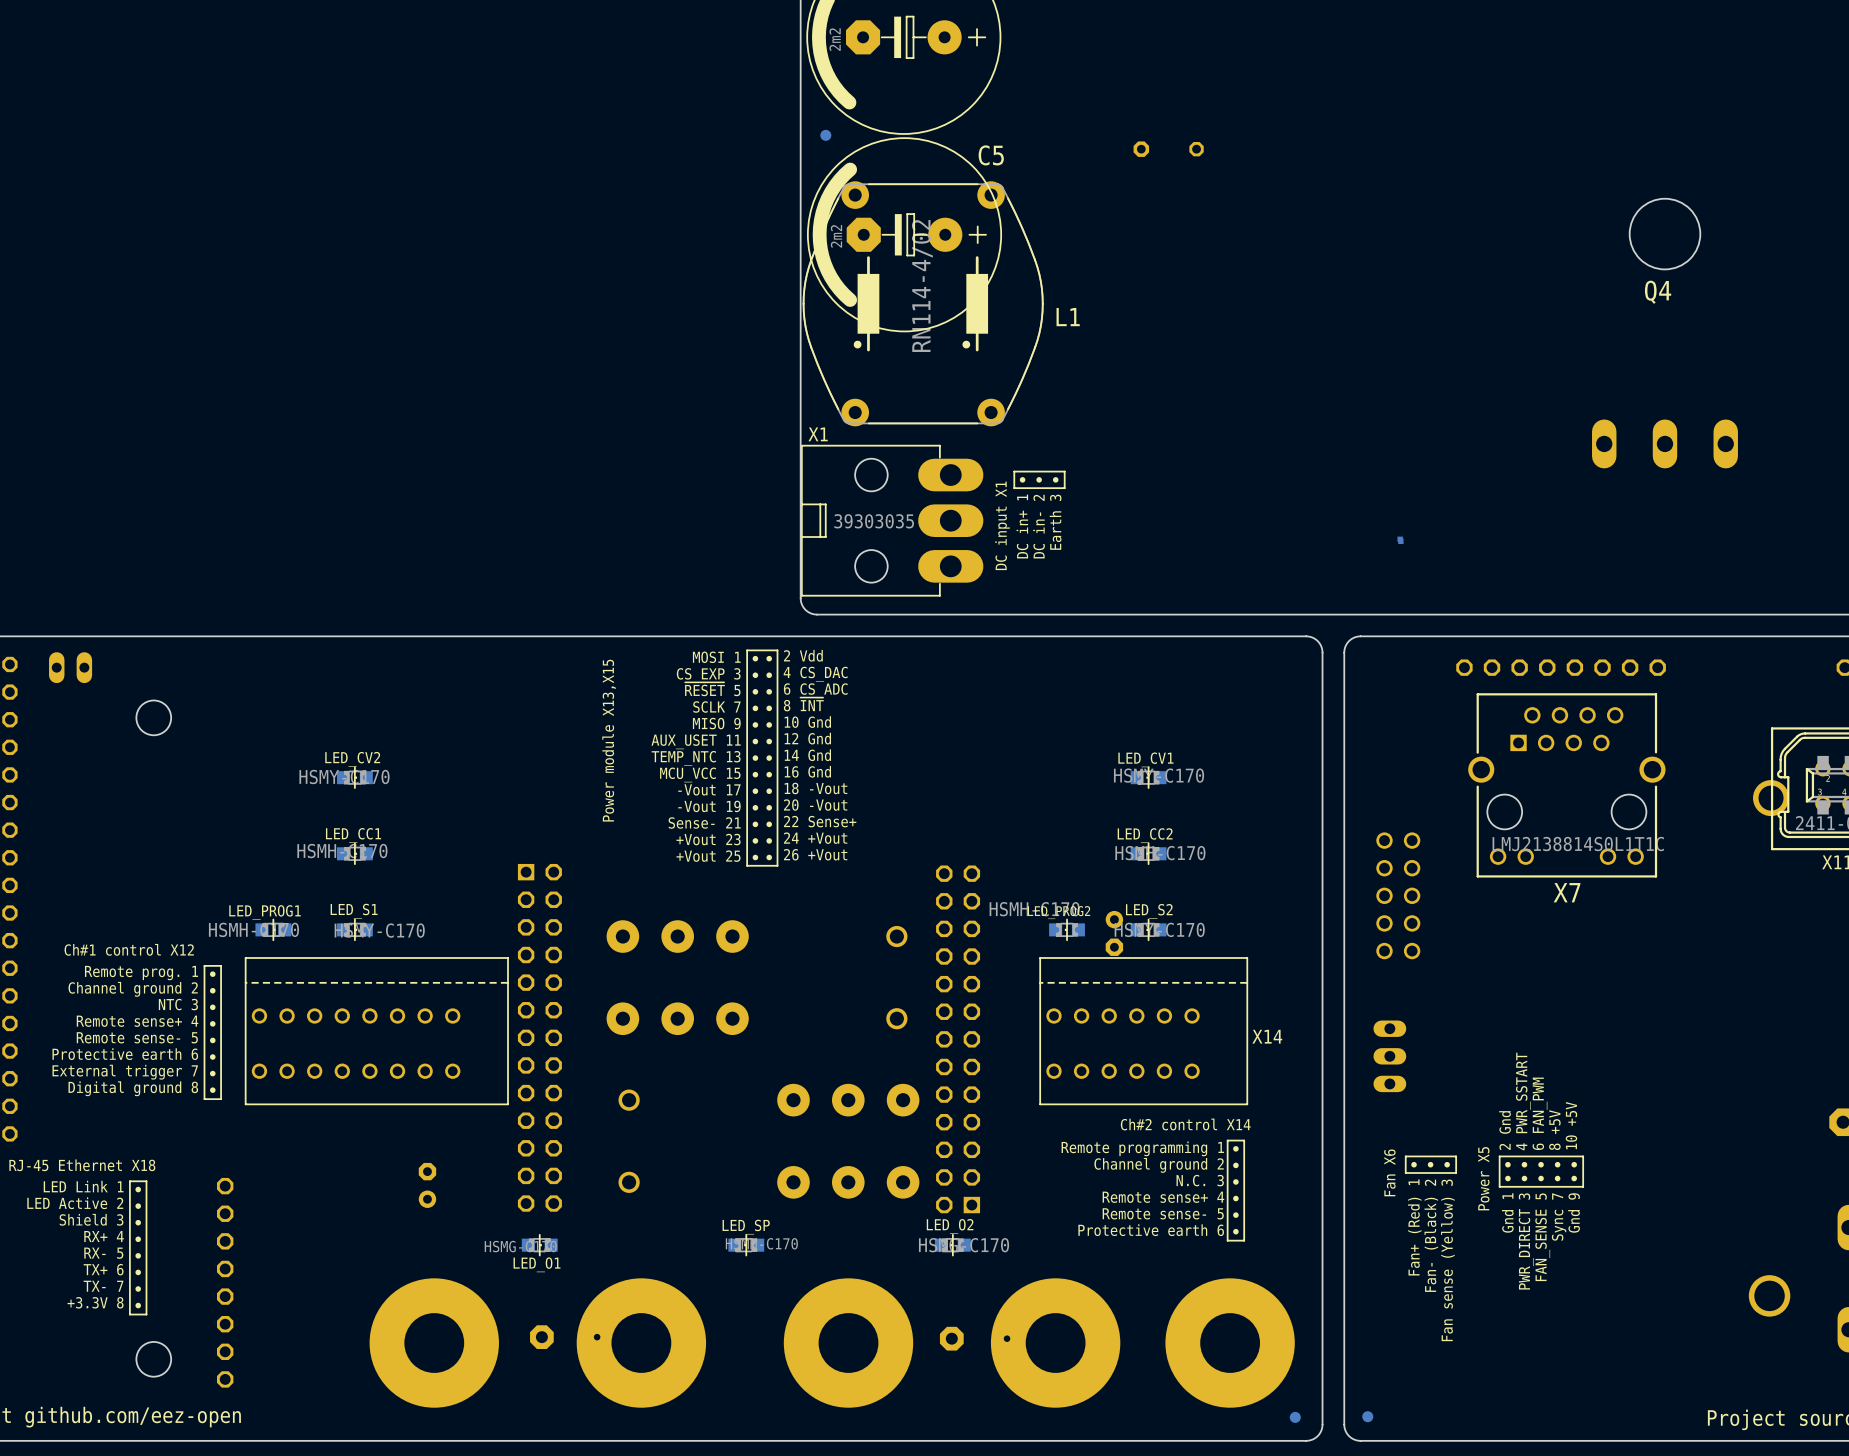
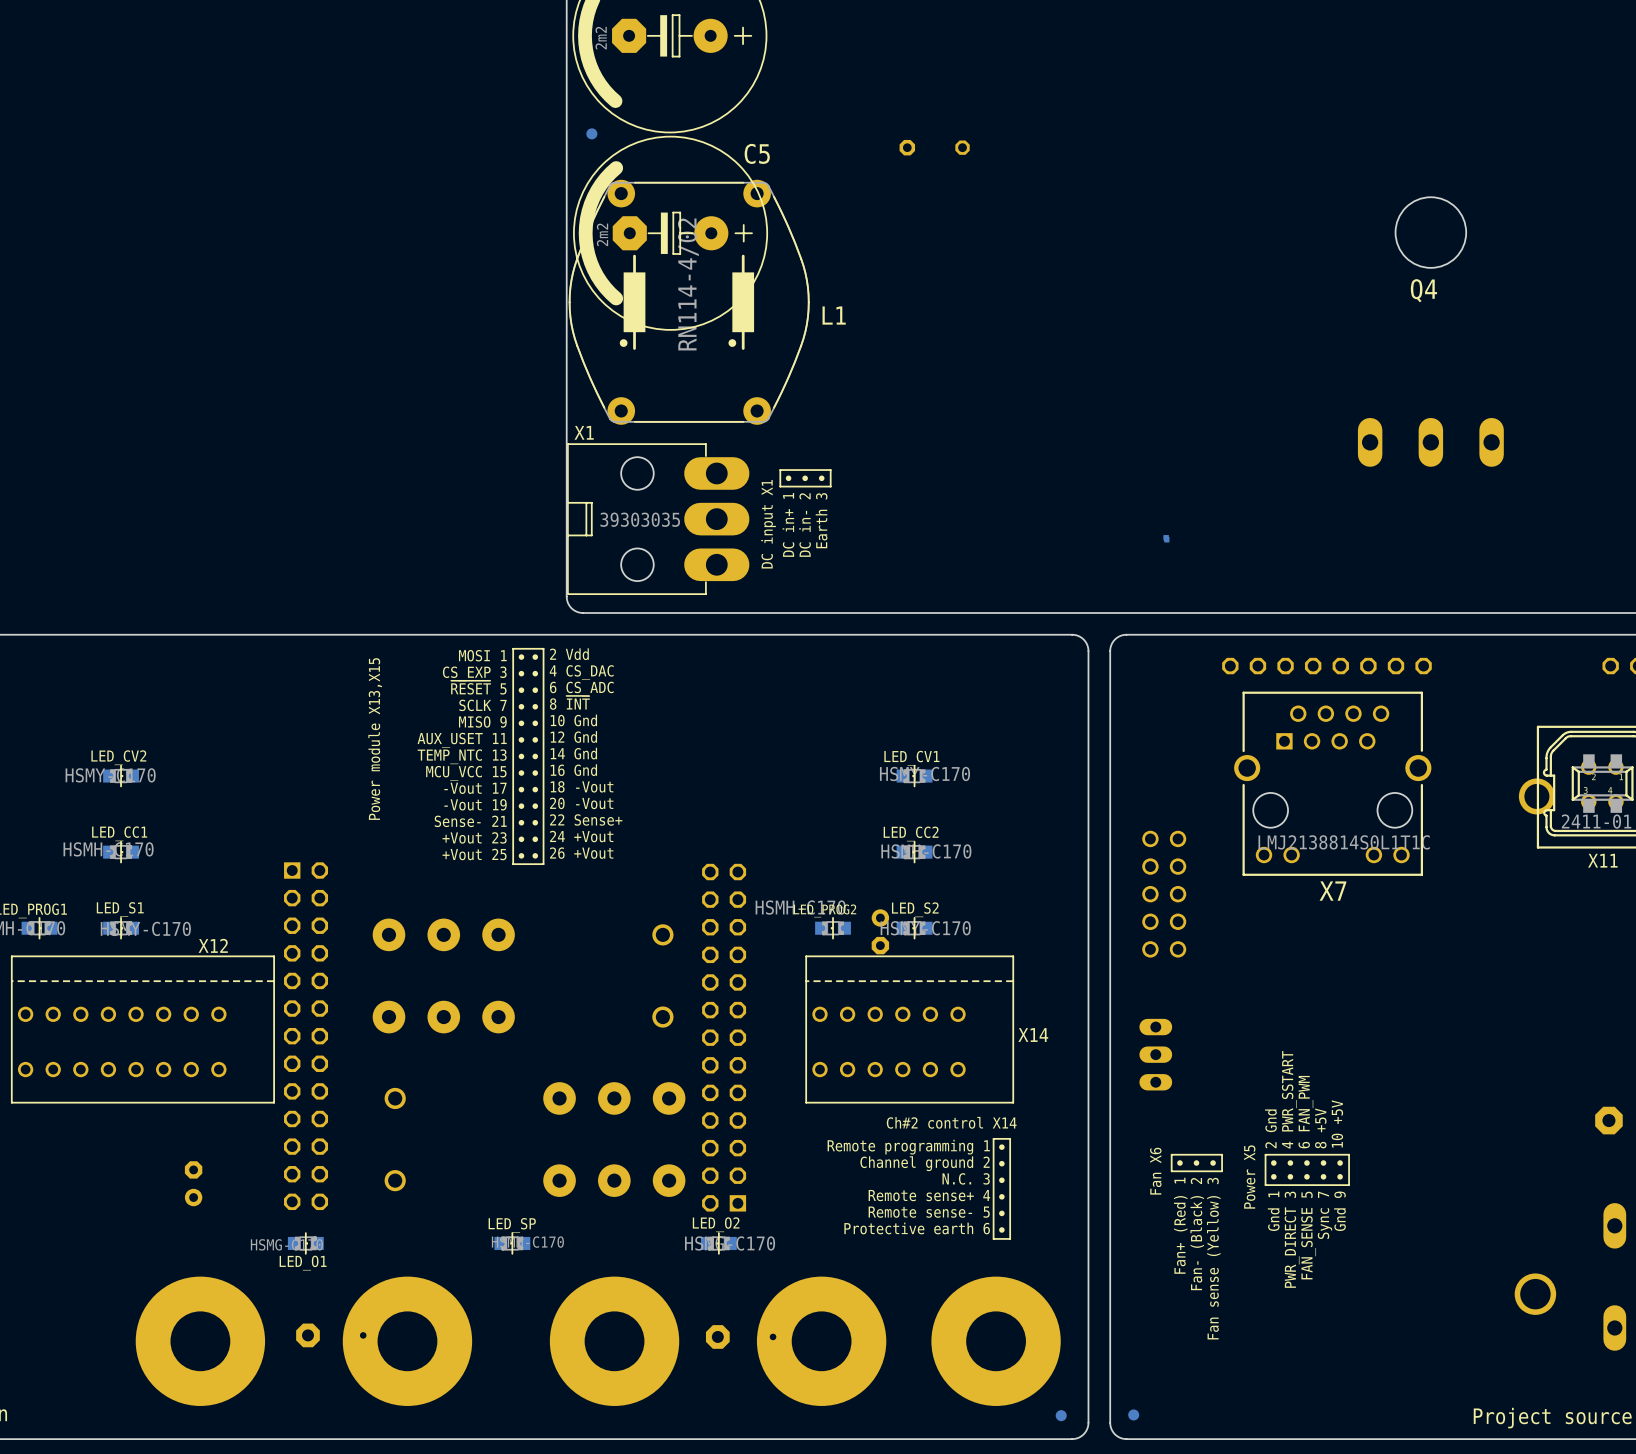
X12 name: none -> X12 (213, 945)

